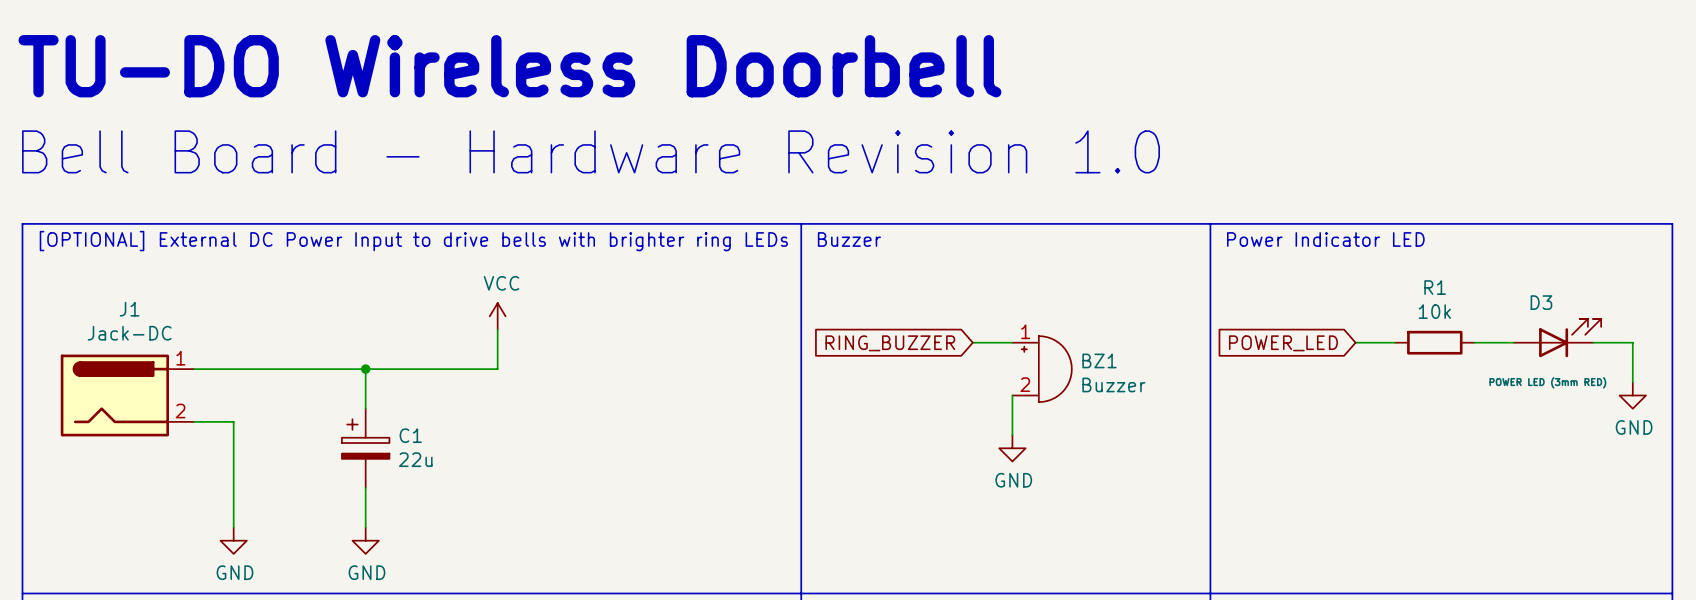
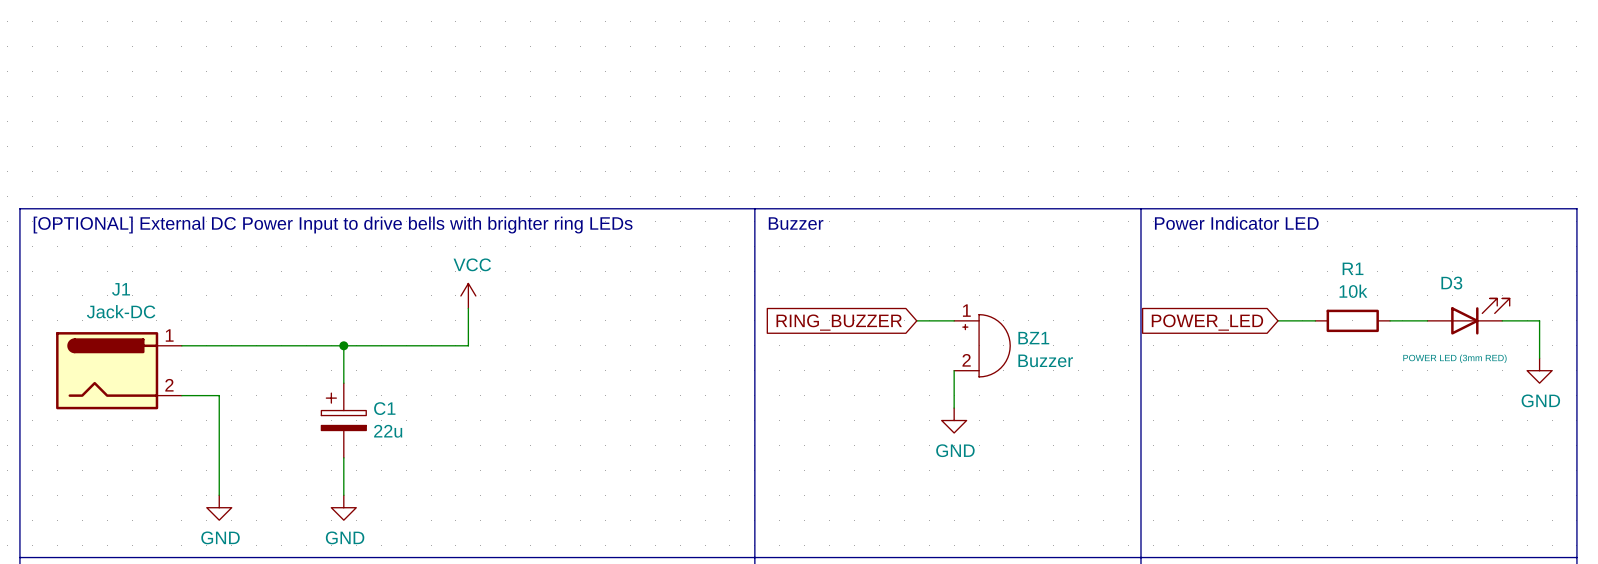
text: TU-DO Wireless Doorbell (509, 66) -> none
text: Bell Board - Hardware Revision 1.0 (591, 151) -> none

